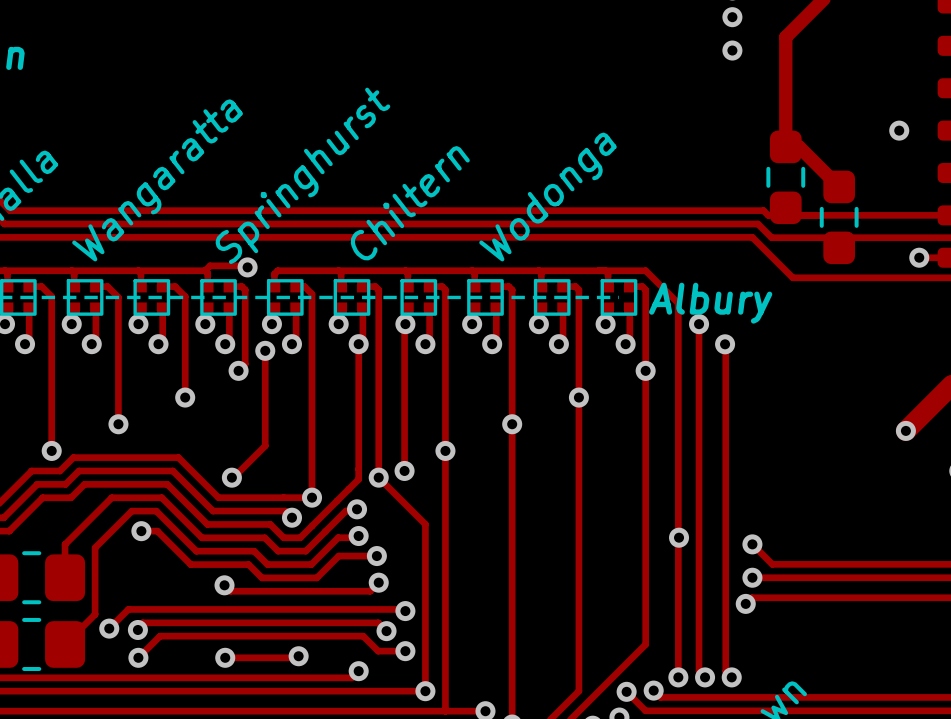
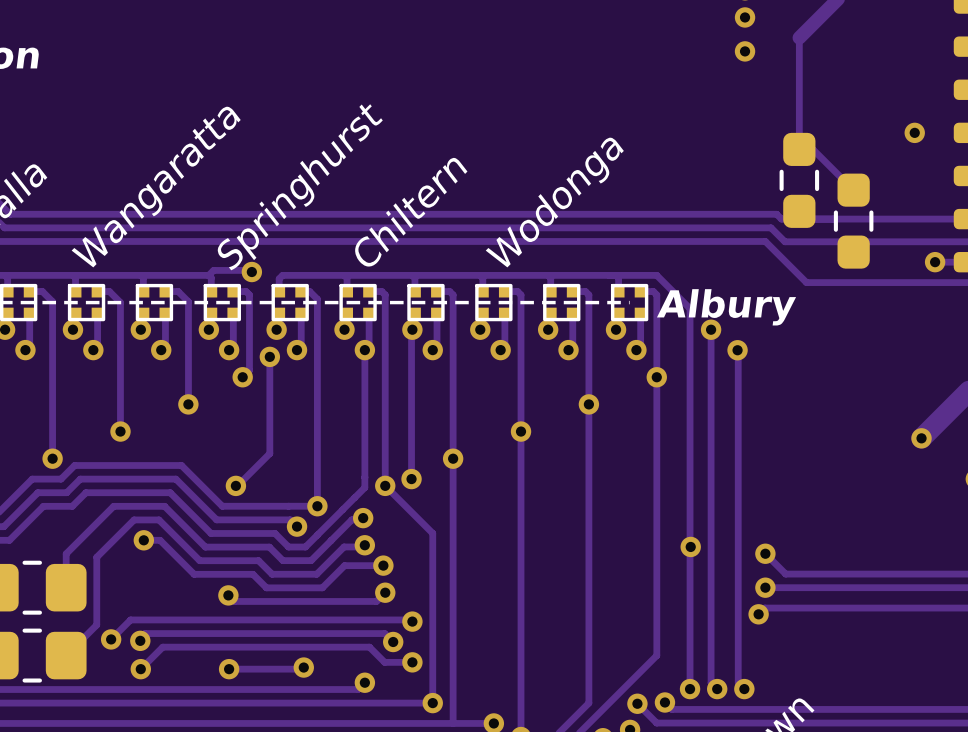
track width: thick (785, 37) (785, 146) (799, 146) (839, 186) -> thin (799, 37) (799, 149) (812, 149) (853, 190)

